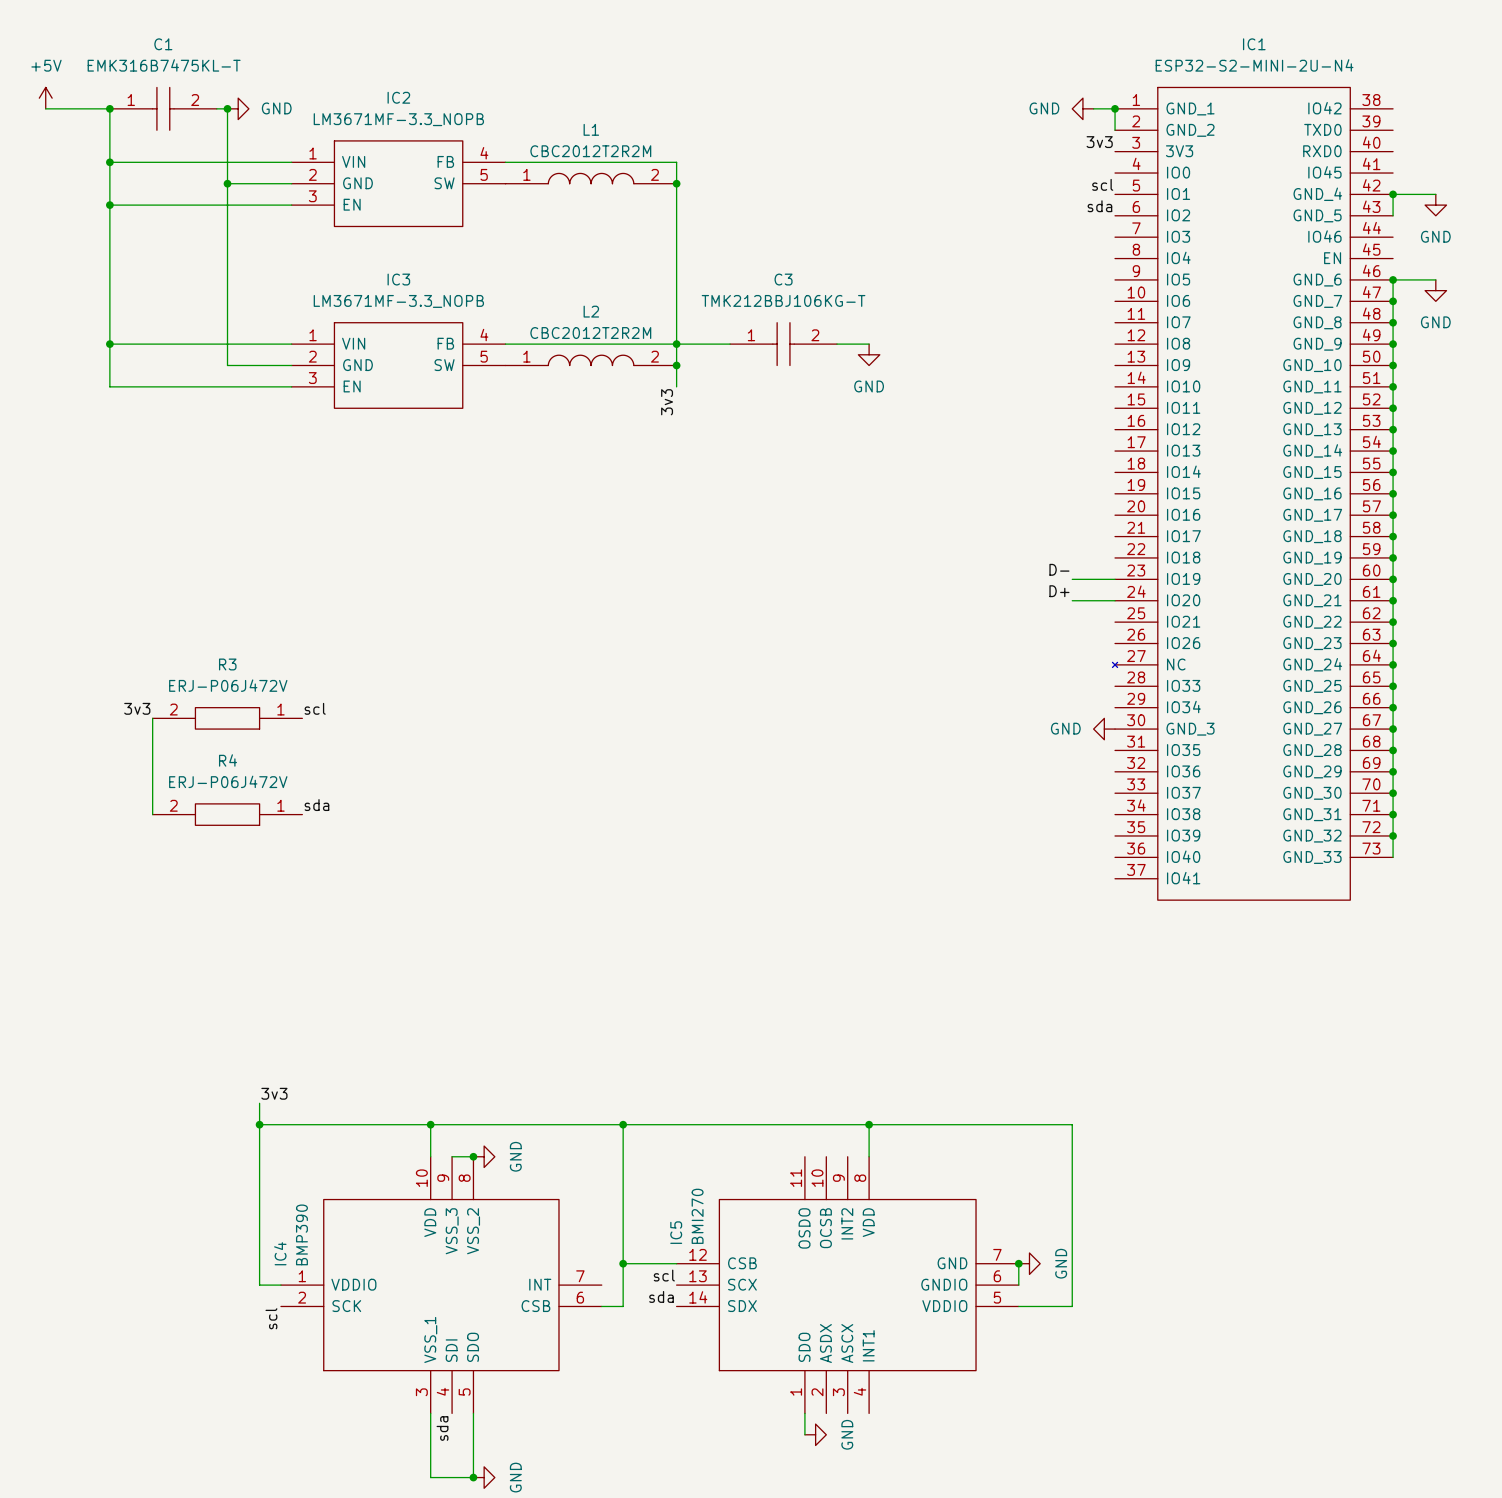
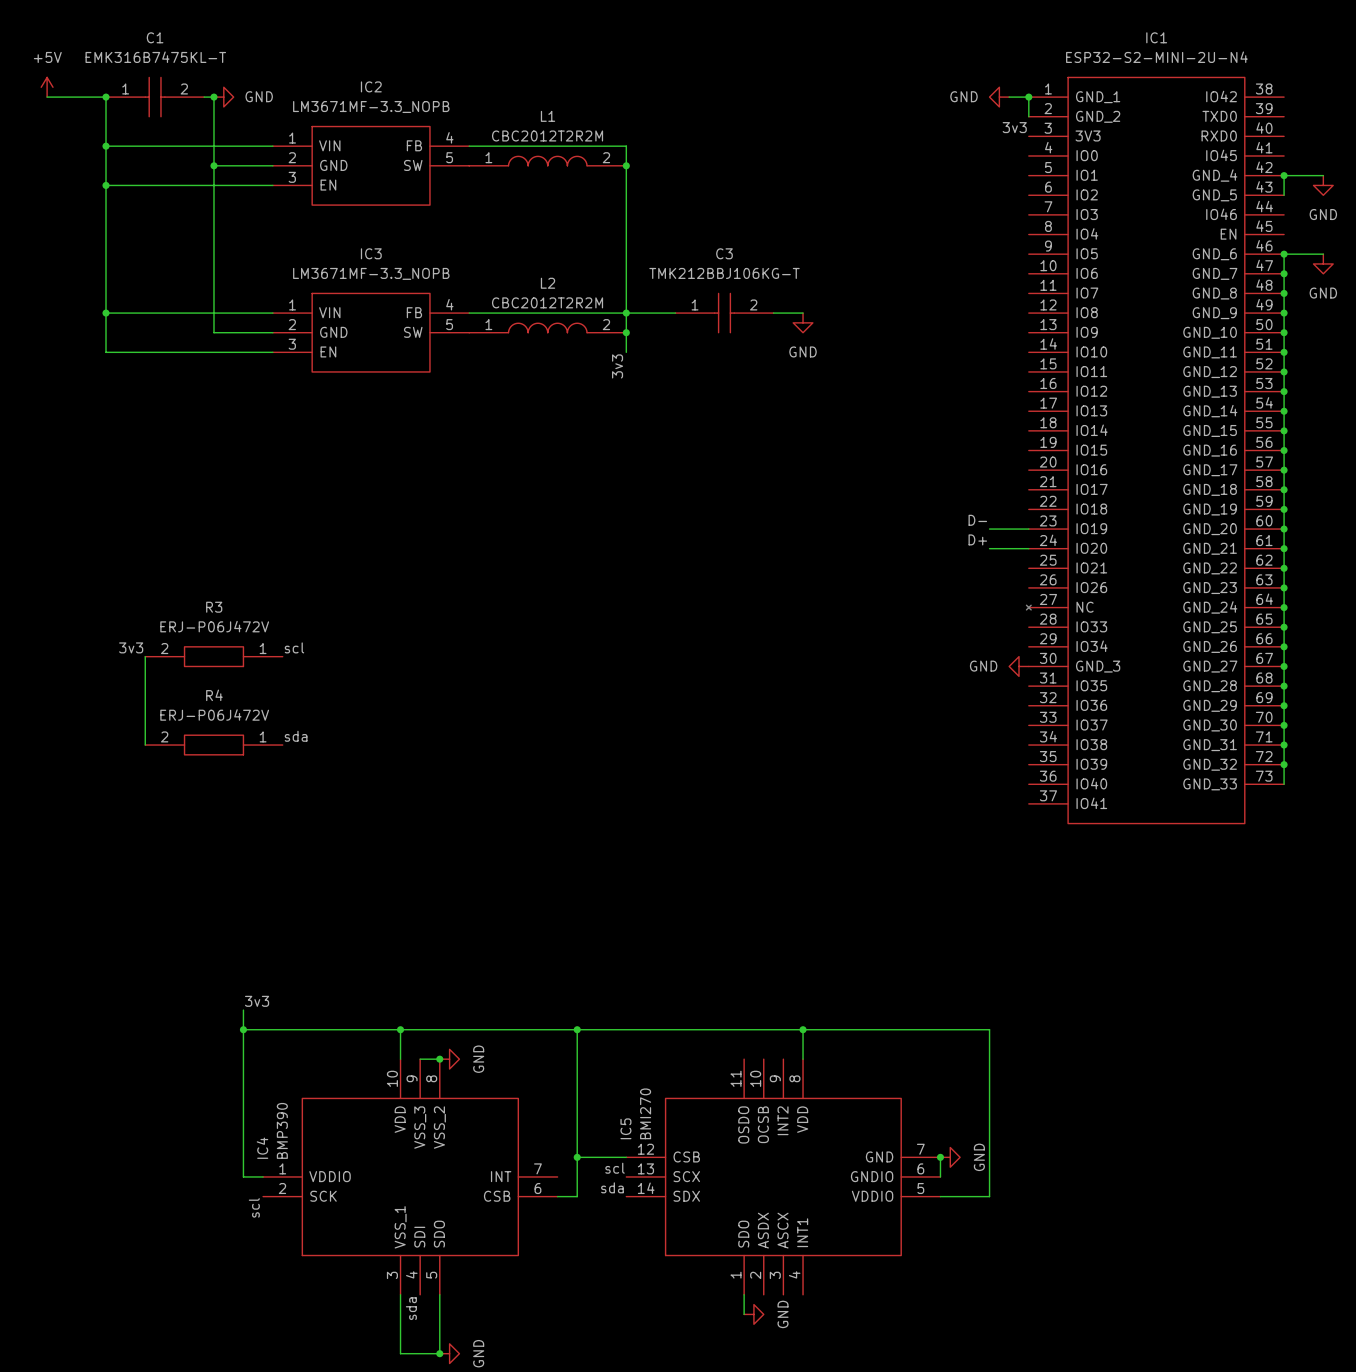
label: scl (1102, 184) -> none
label: sda (1099, 206) -> none

